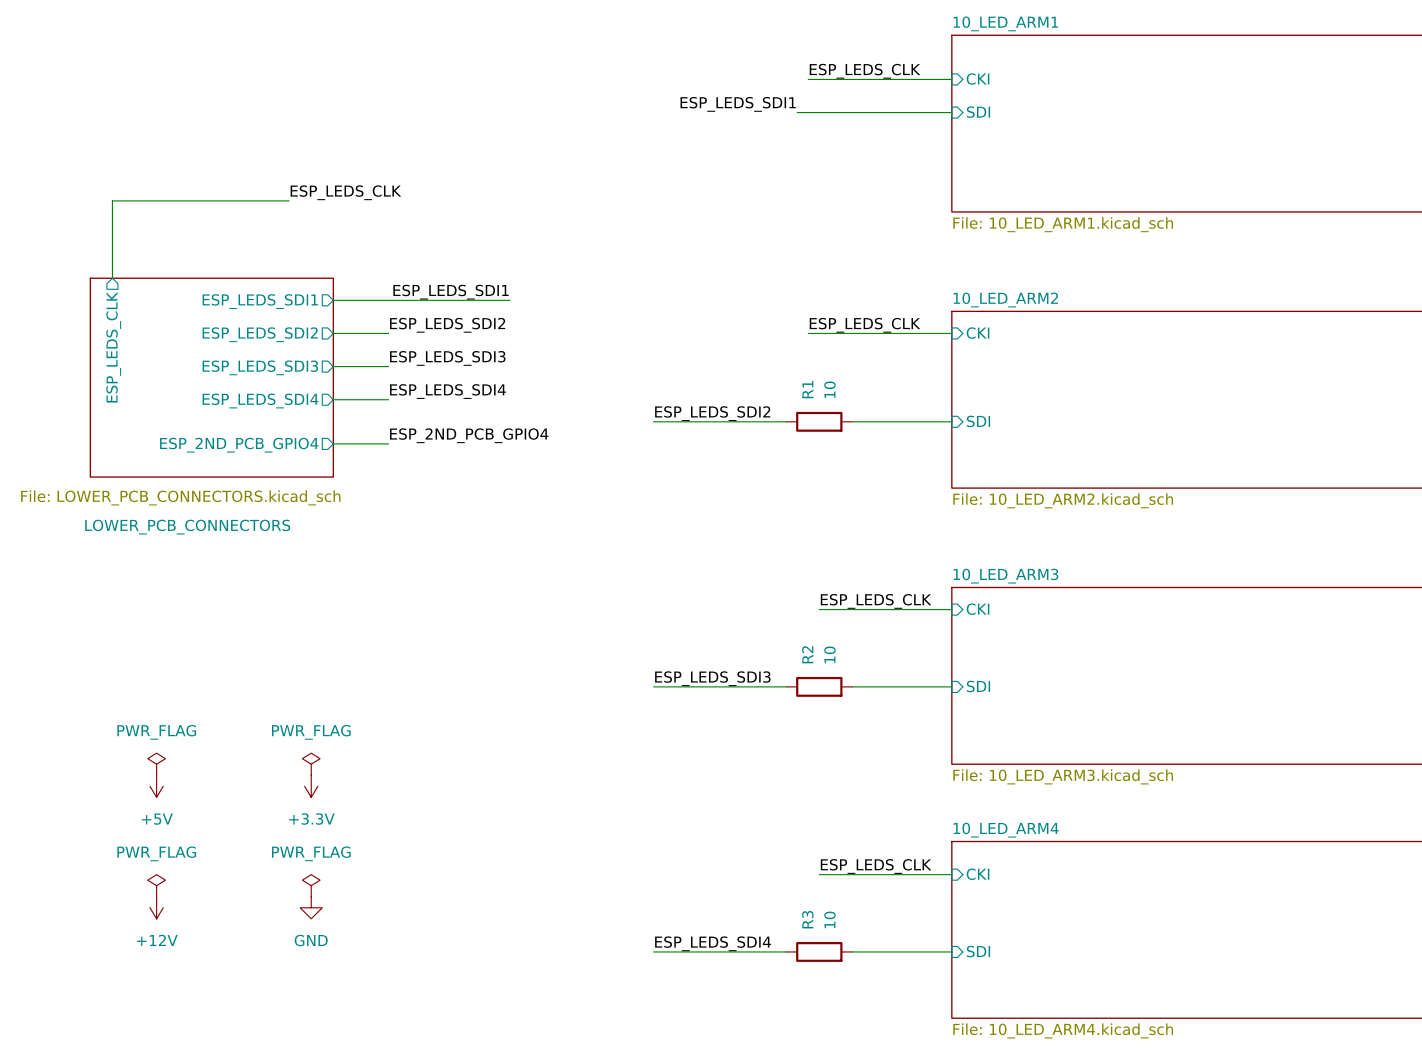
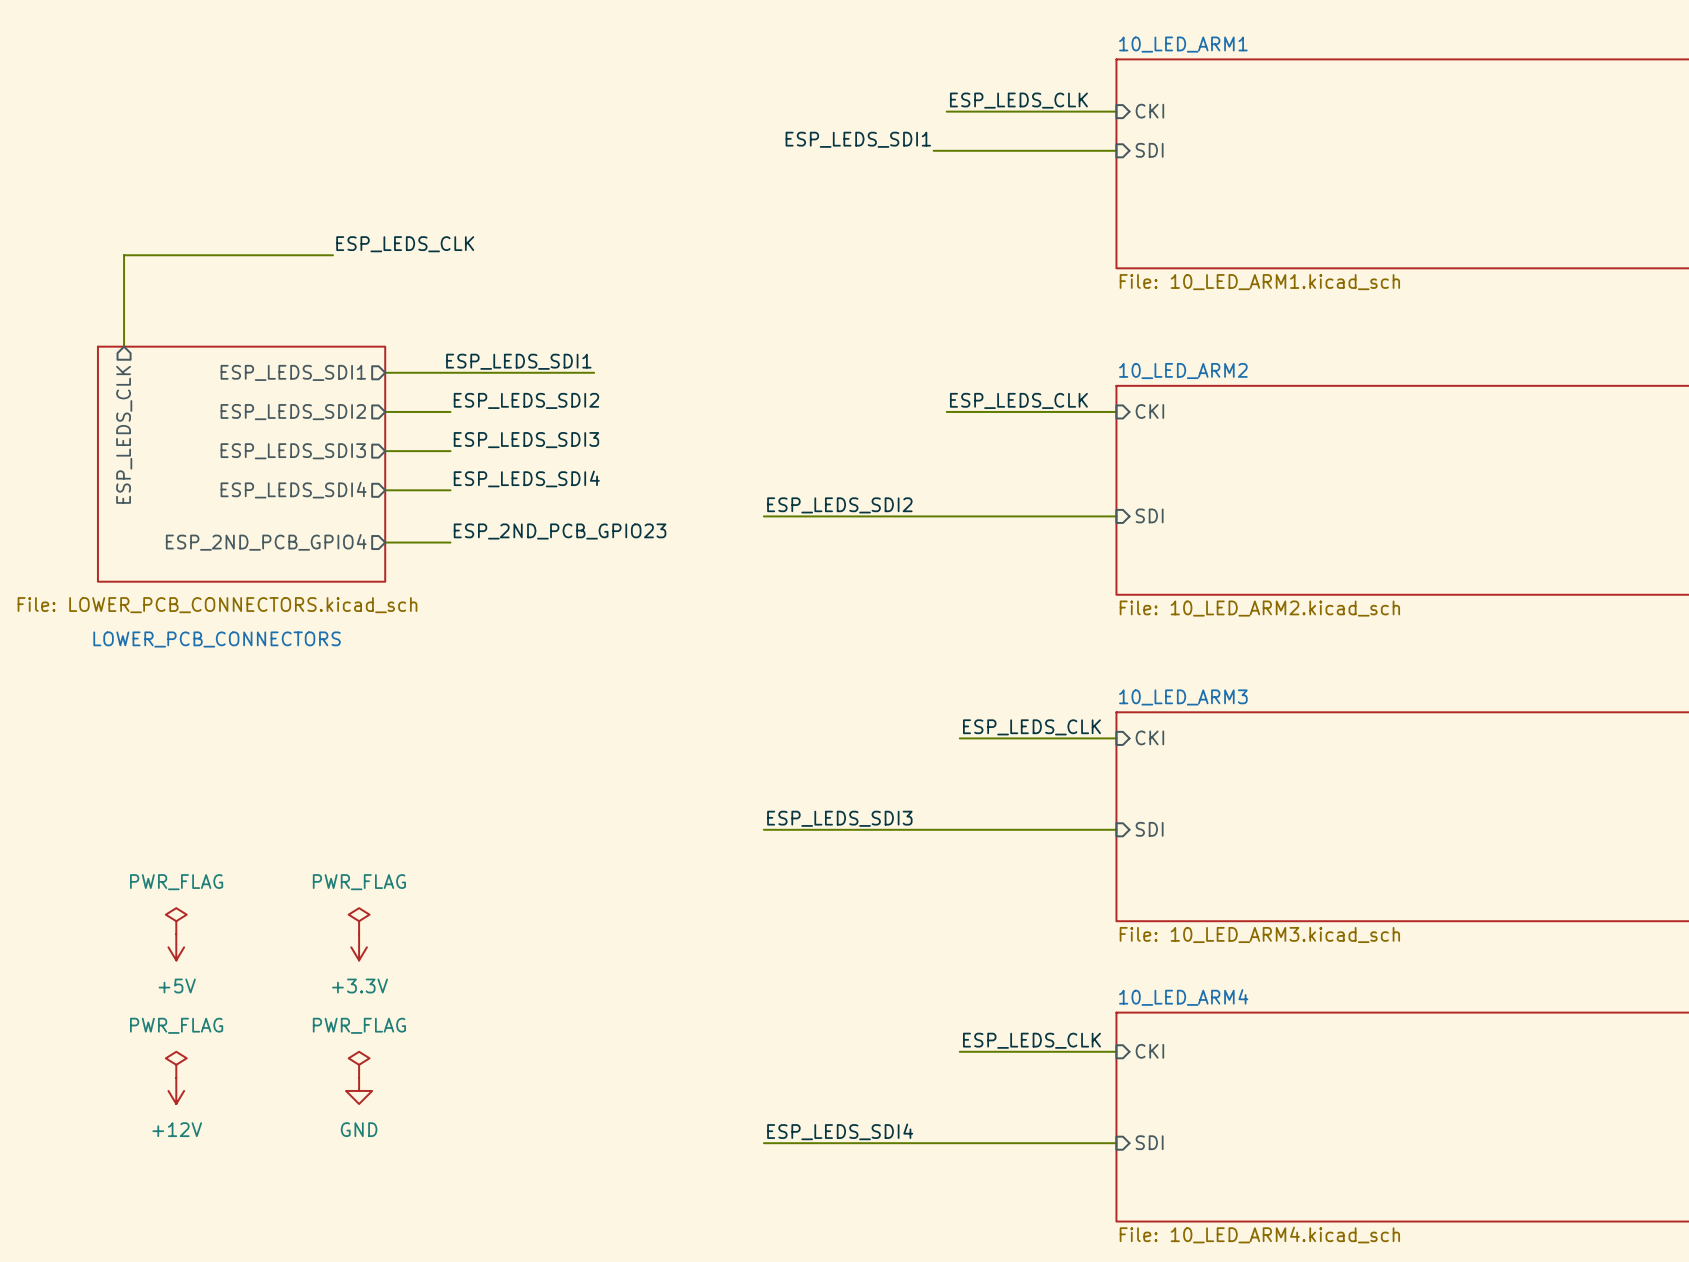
wire: none -> (920, 516) (998, 516)
R1: 10 (819, 421) -> none
label: ESP_2ND_PCB_GPIO4 (469, 435) -> ESP_2ND_PCB_GPIO23 (560, 531)
wire: none -> (920, 829) (998, 829)
R2: 10 (819, 686) -> none
wire: none -> (920, 1143) (998, 1143)
R3: 10 (819, 951) -> none

